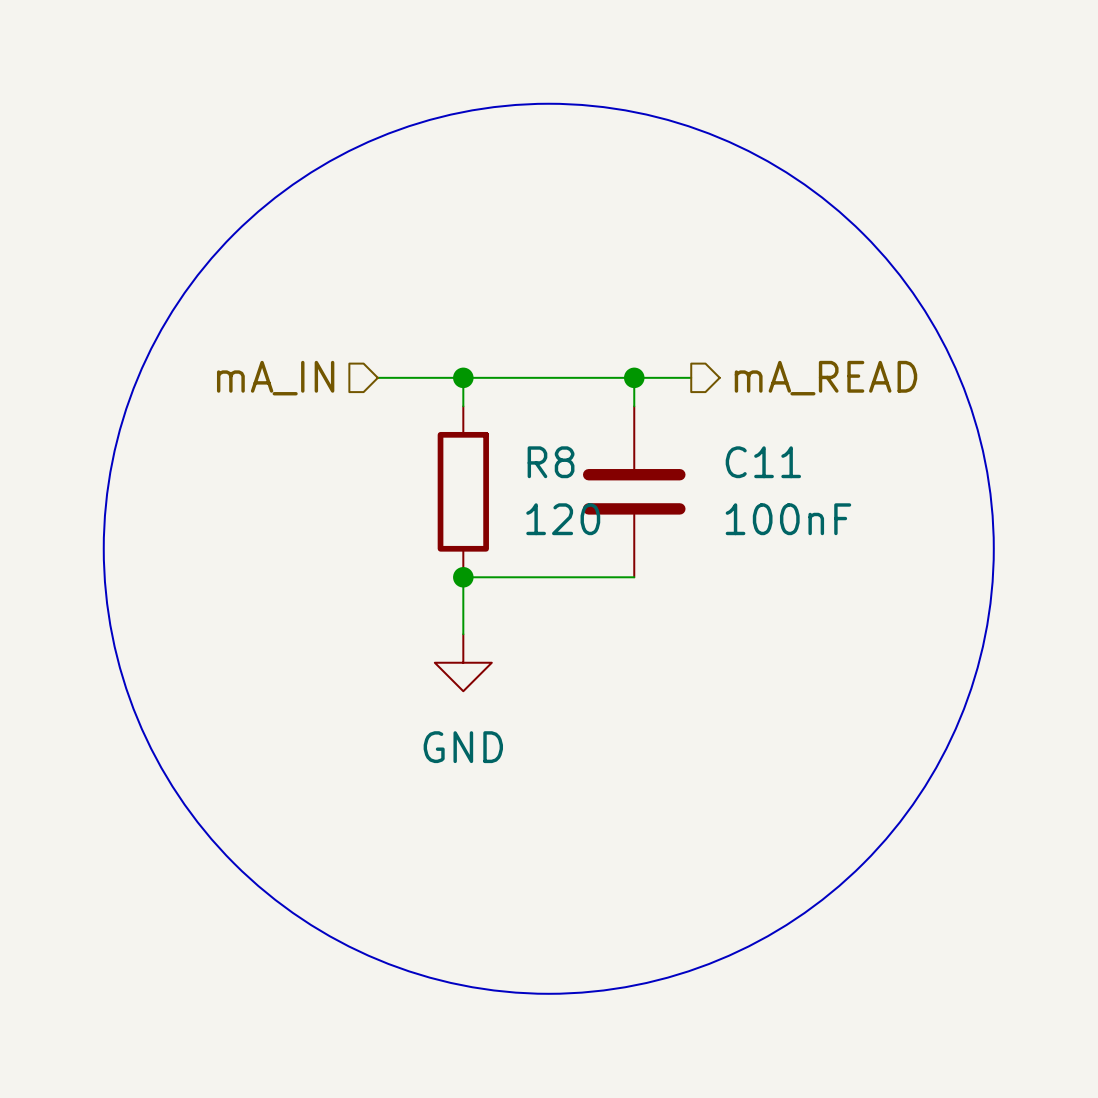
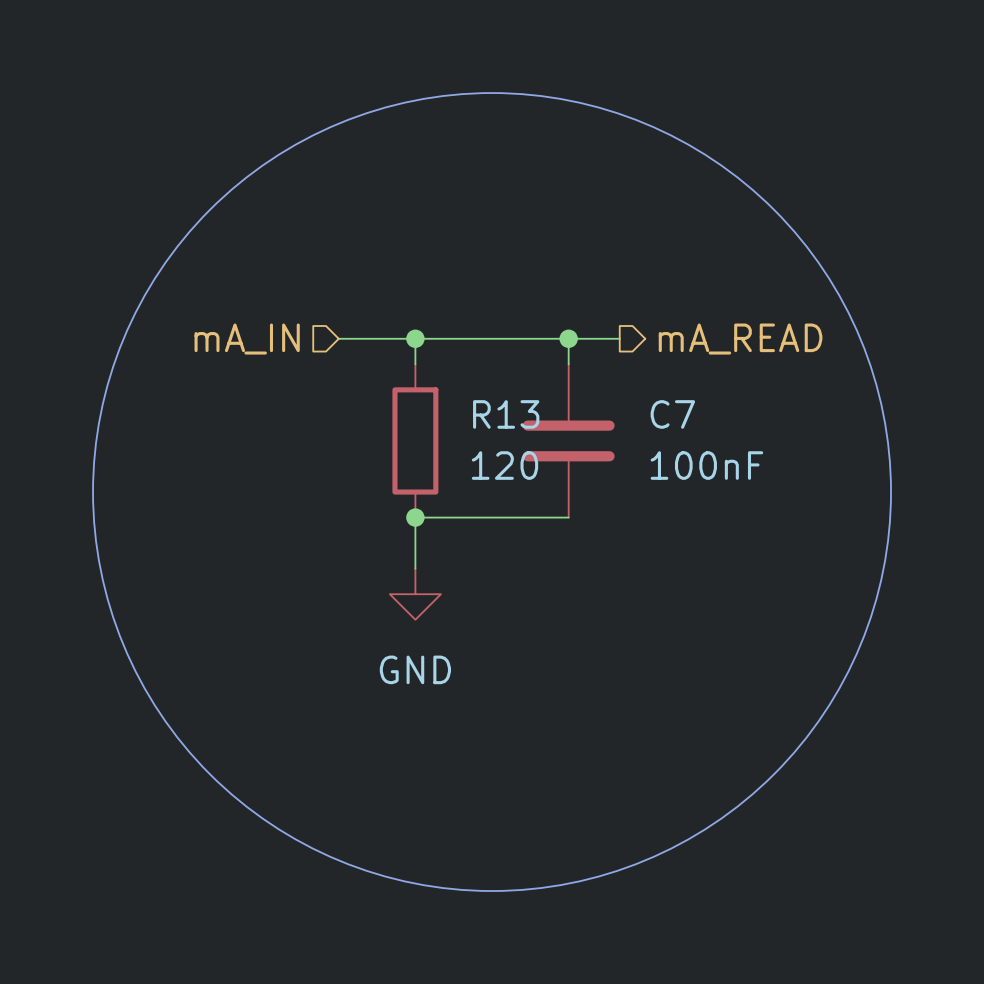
R8 name: R8 (551, 462) -> R13 (506, 414)
C11 name: C11 (763, 462) -> C7 (672, 414)

